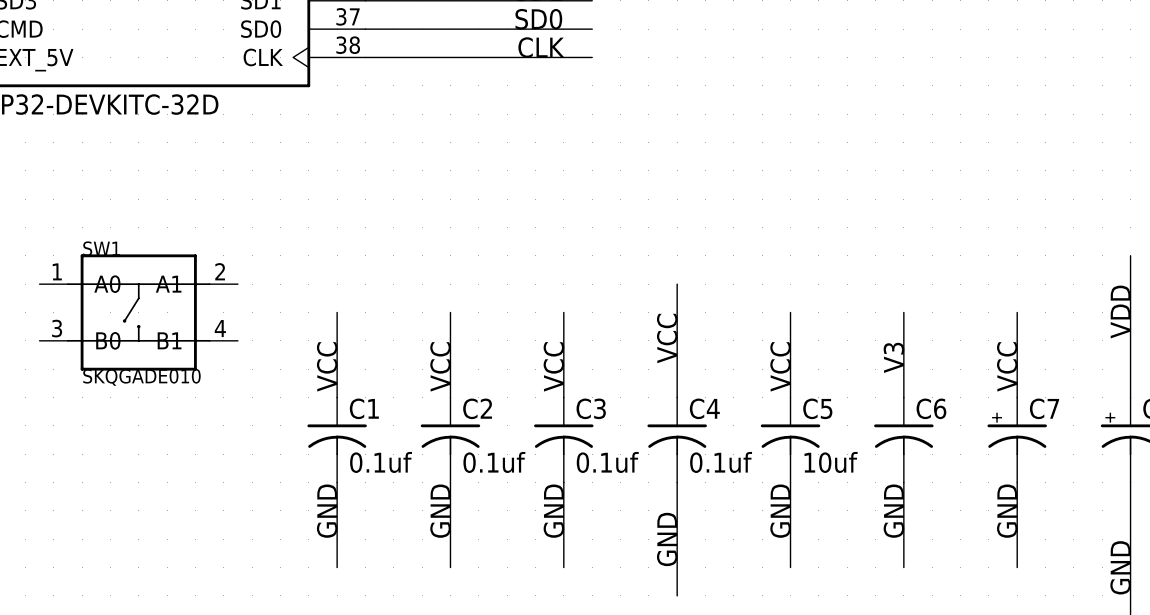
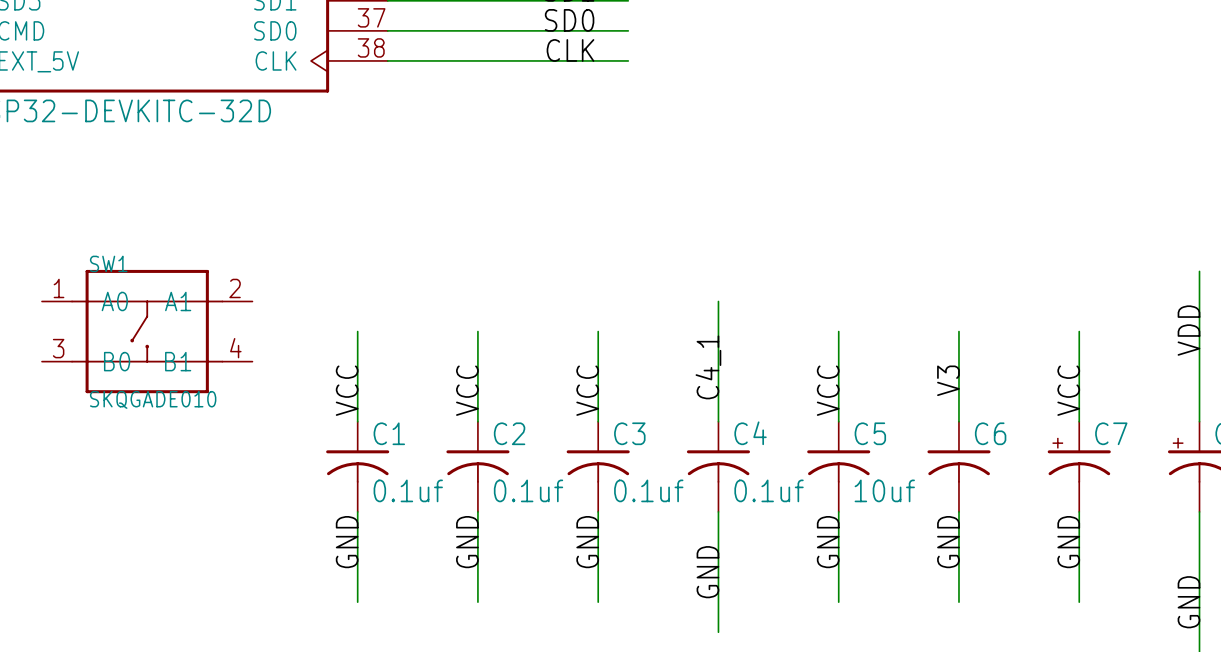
label: VCC (667, 338) -> C4_1 (708, 367)

